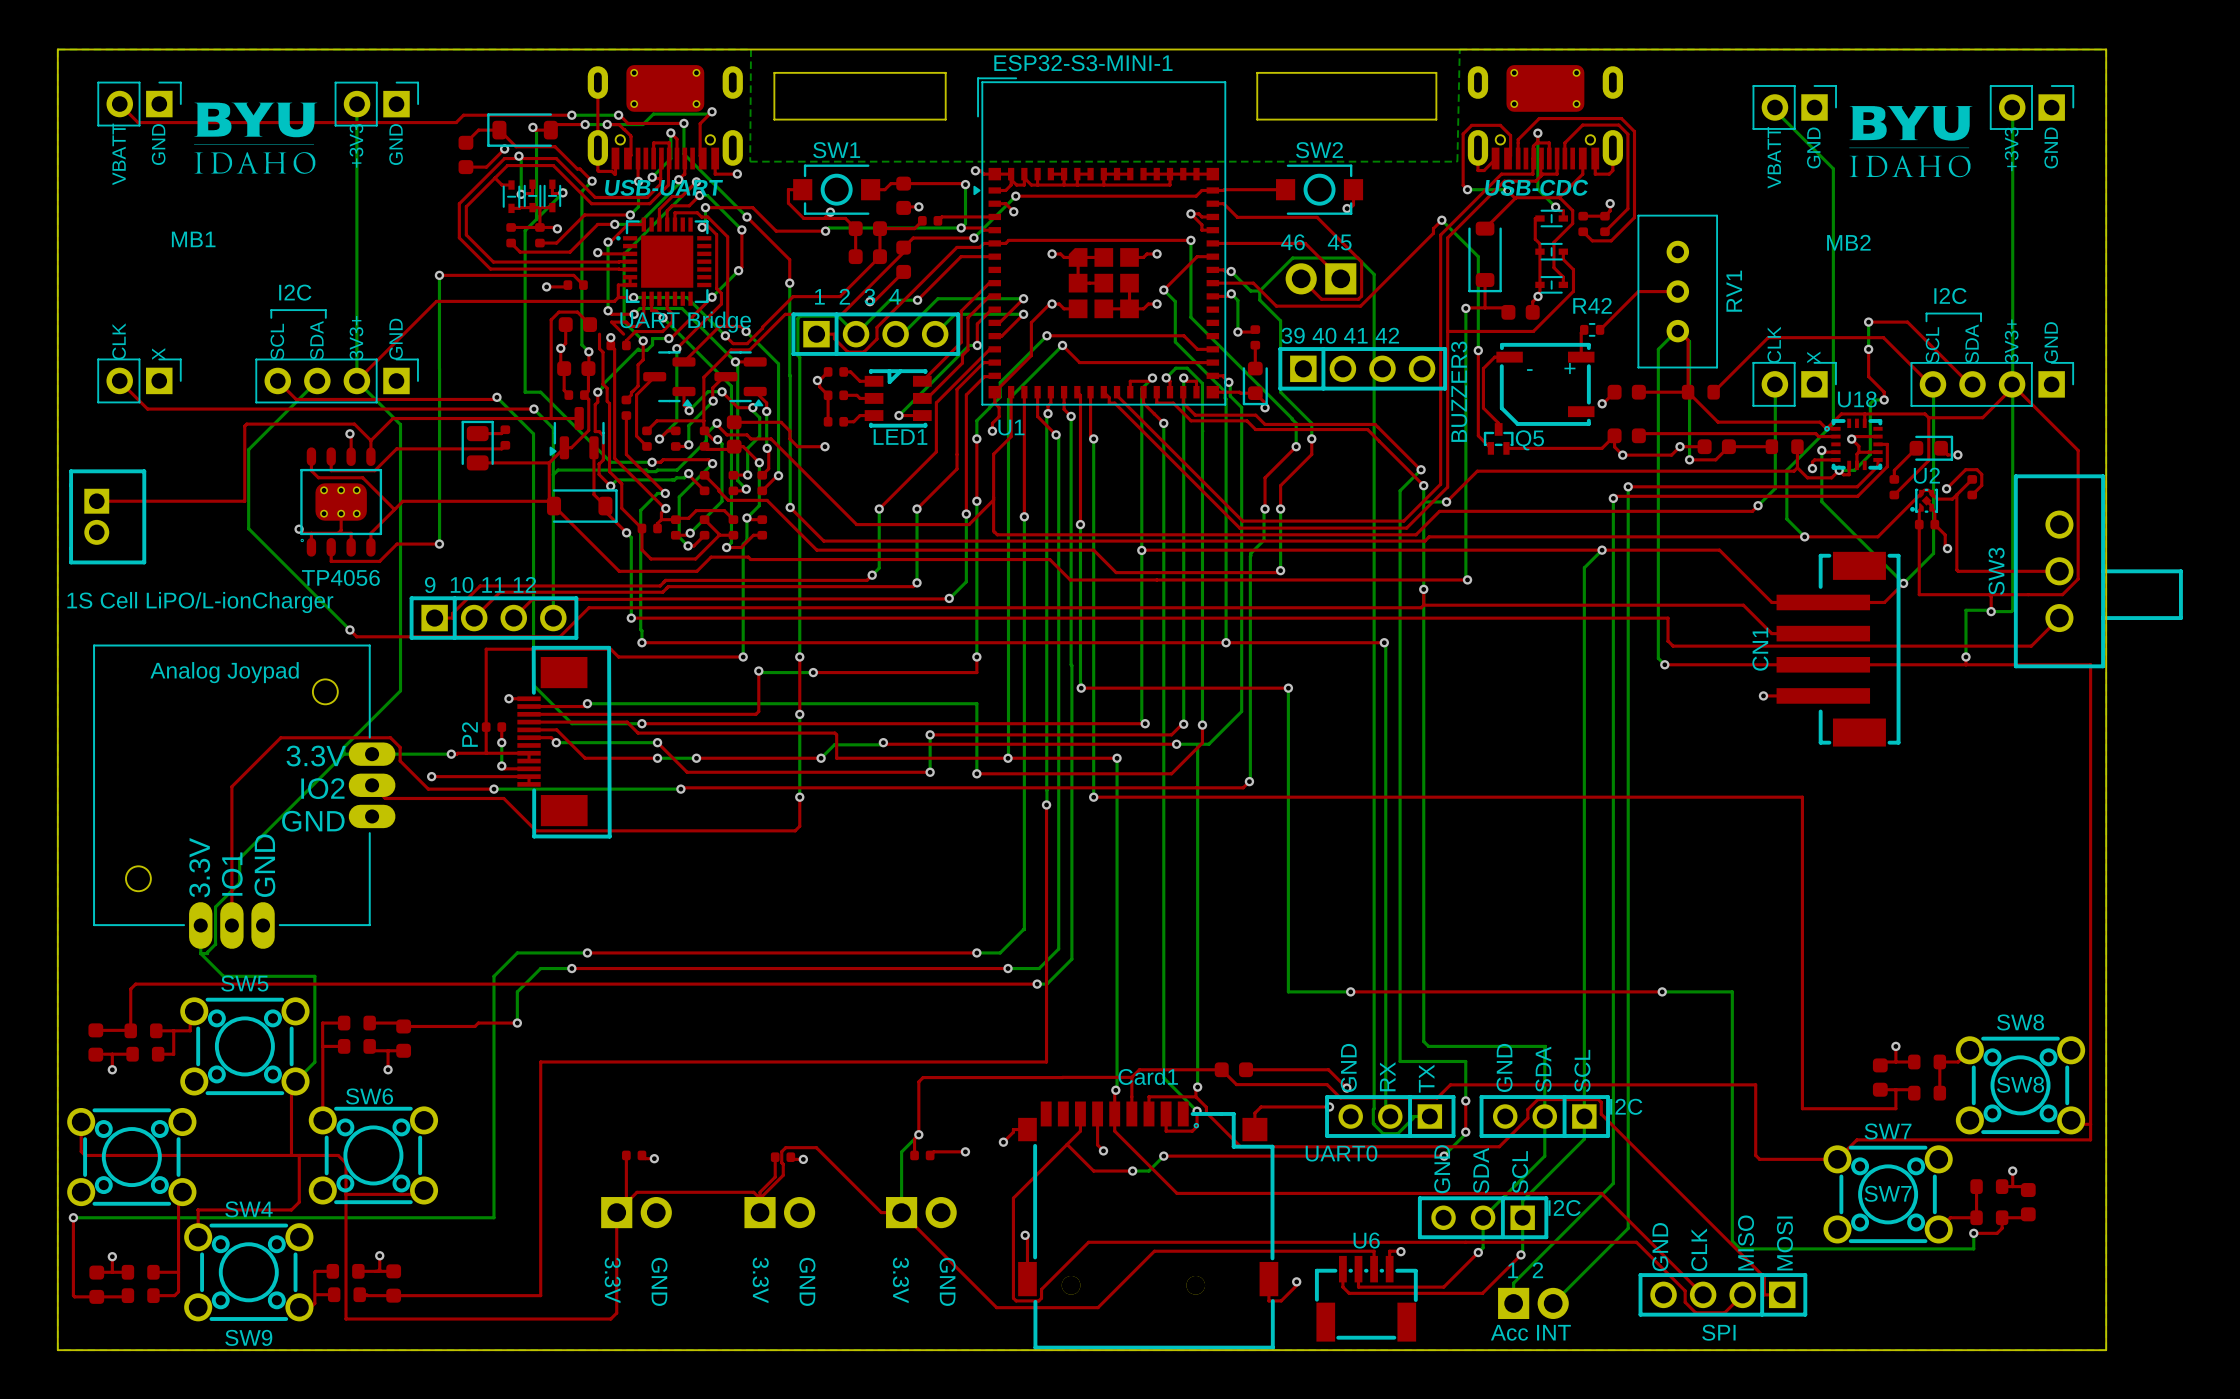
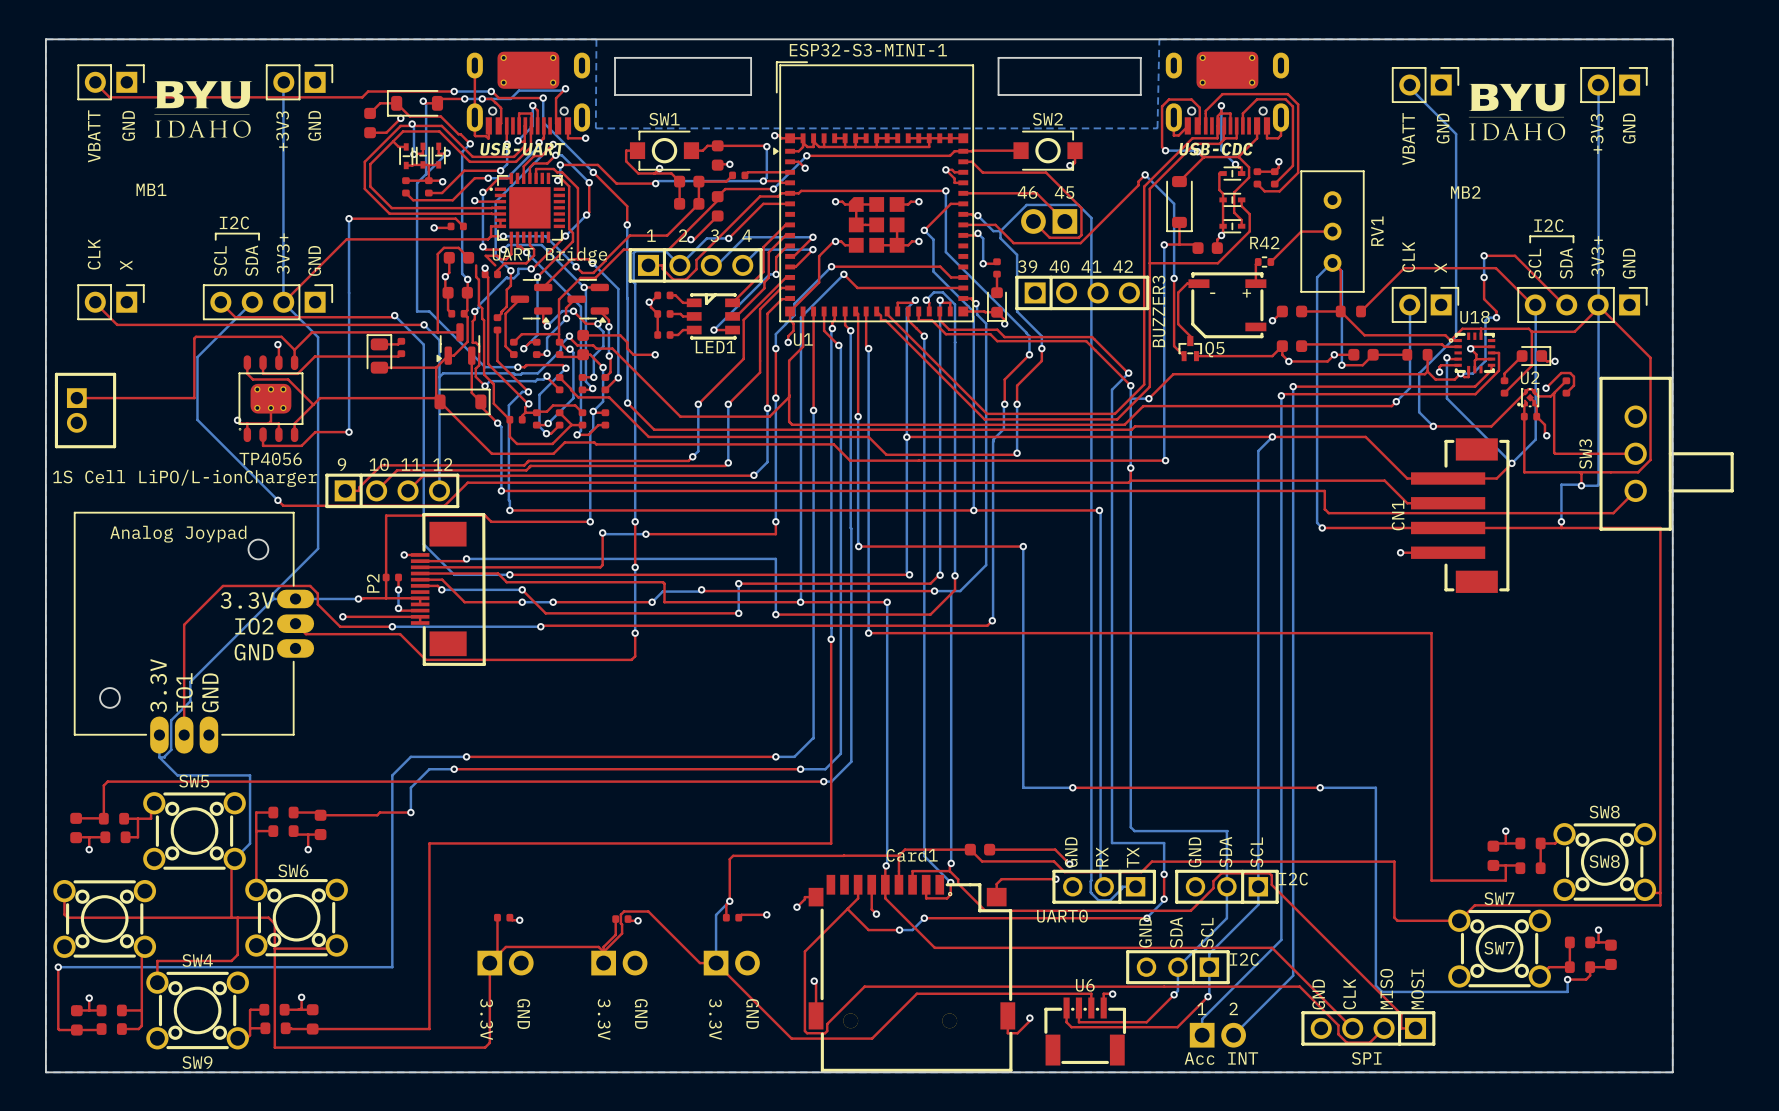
MB1 footprint: [97, 81, 420, 404] -> [77, 64, 334, 321]
MB2 footprint: [1752, 85, 2075, 407] -> [1391, 67, 1648, 323]

